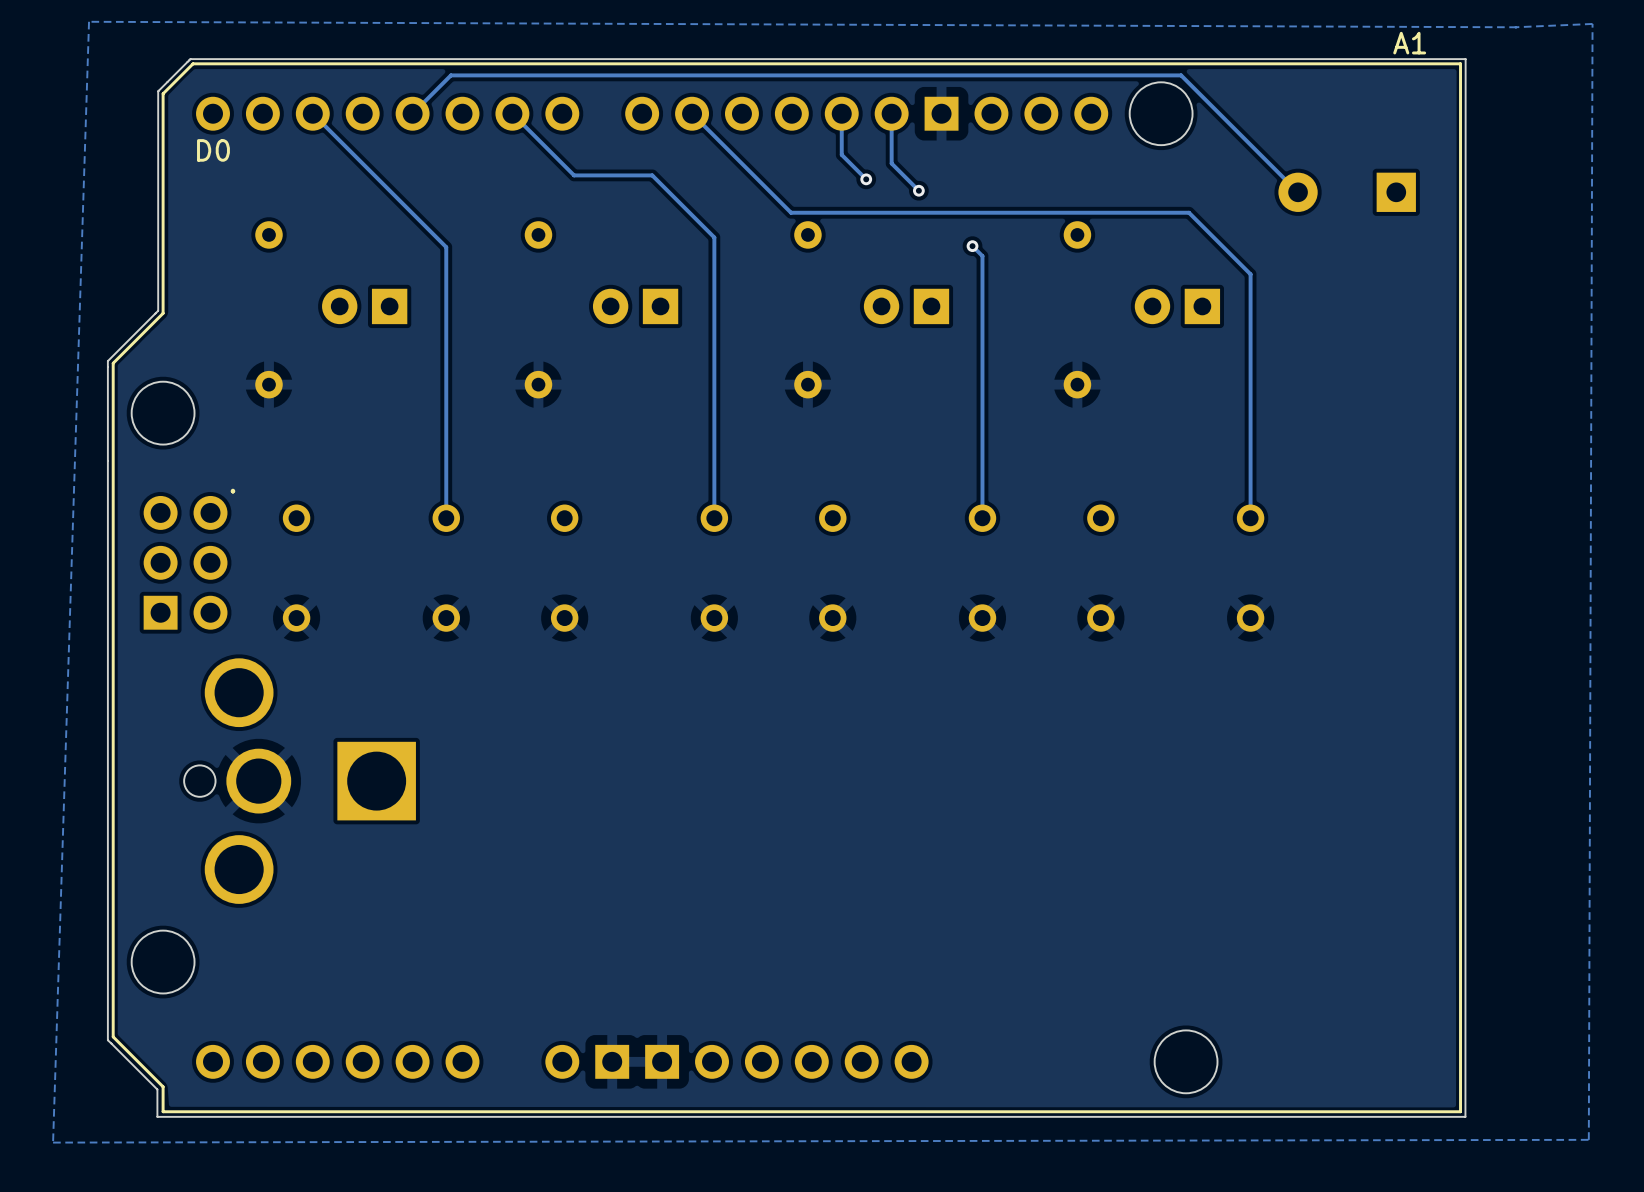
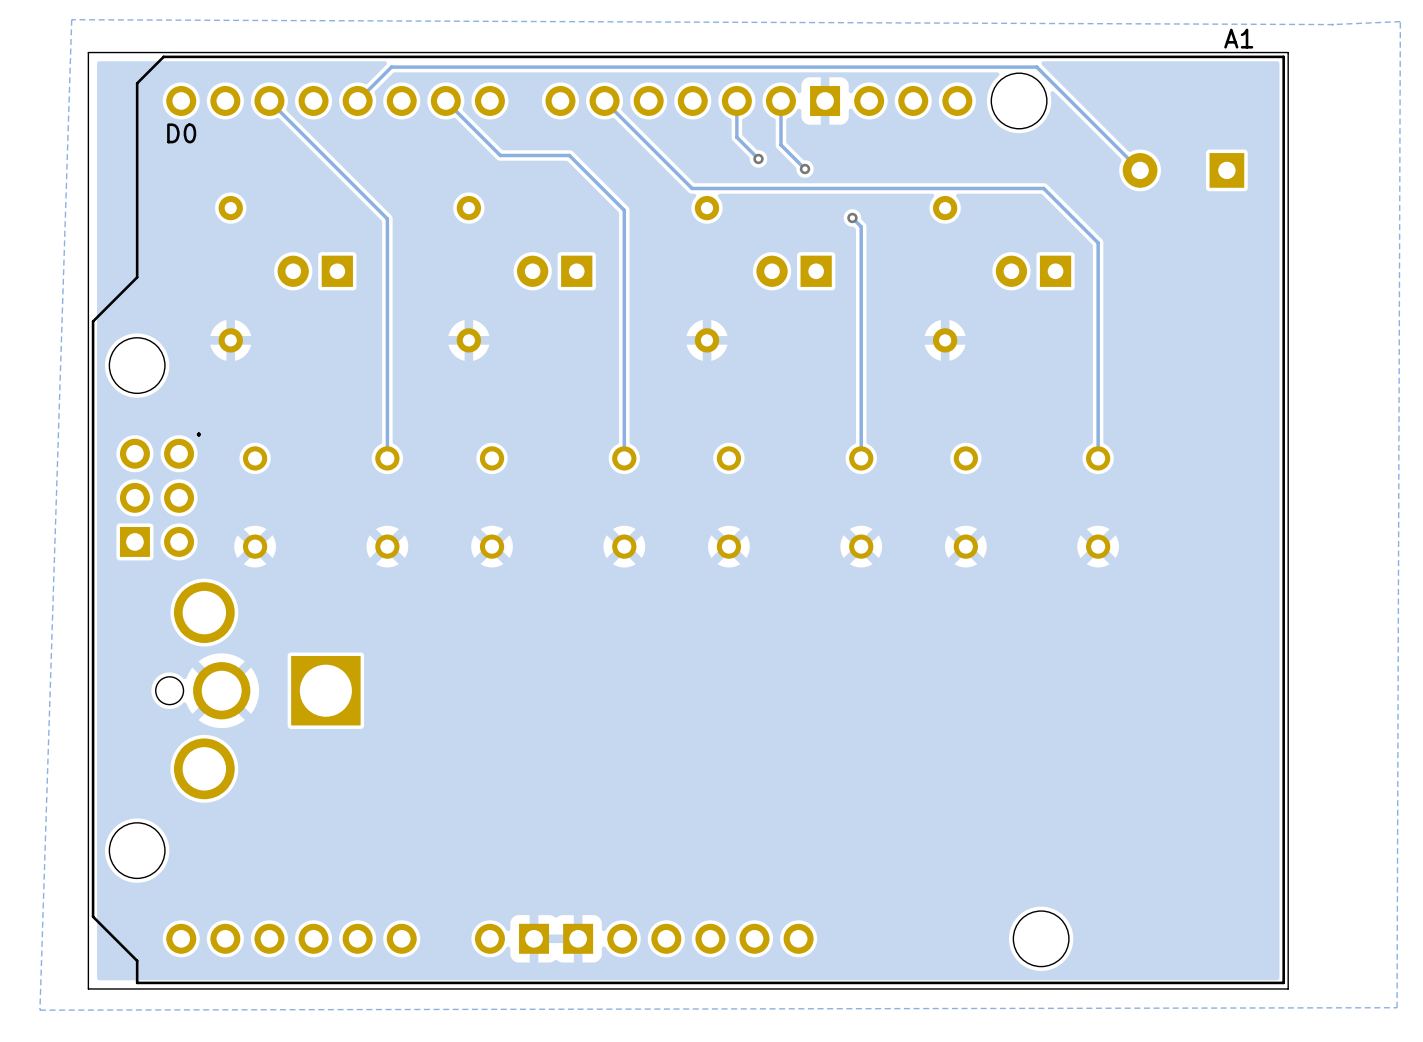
board edge: (107, 361) (158, 310) (158, 91) (190, 59) (1465, 59) (1465, 1116) (157, 1116) (157, 1089) (107, 1040) -> (88, 319) (88, 52) (1288, 52) (1288, 988) (88, 988) (88, 919)

